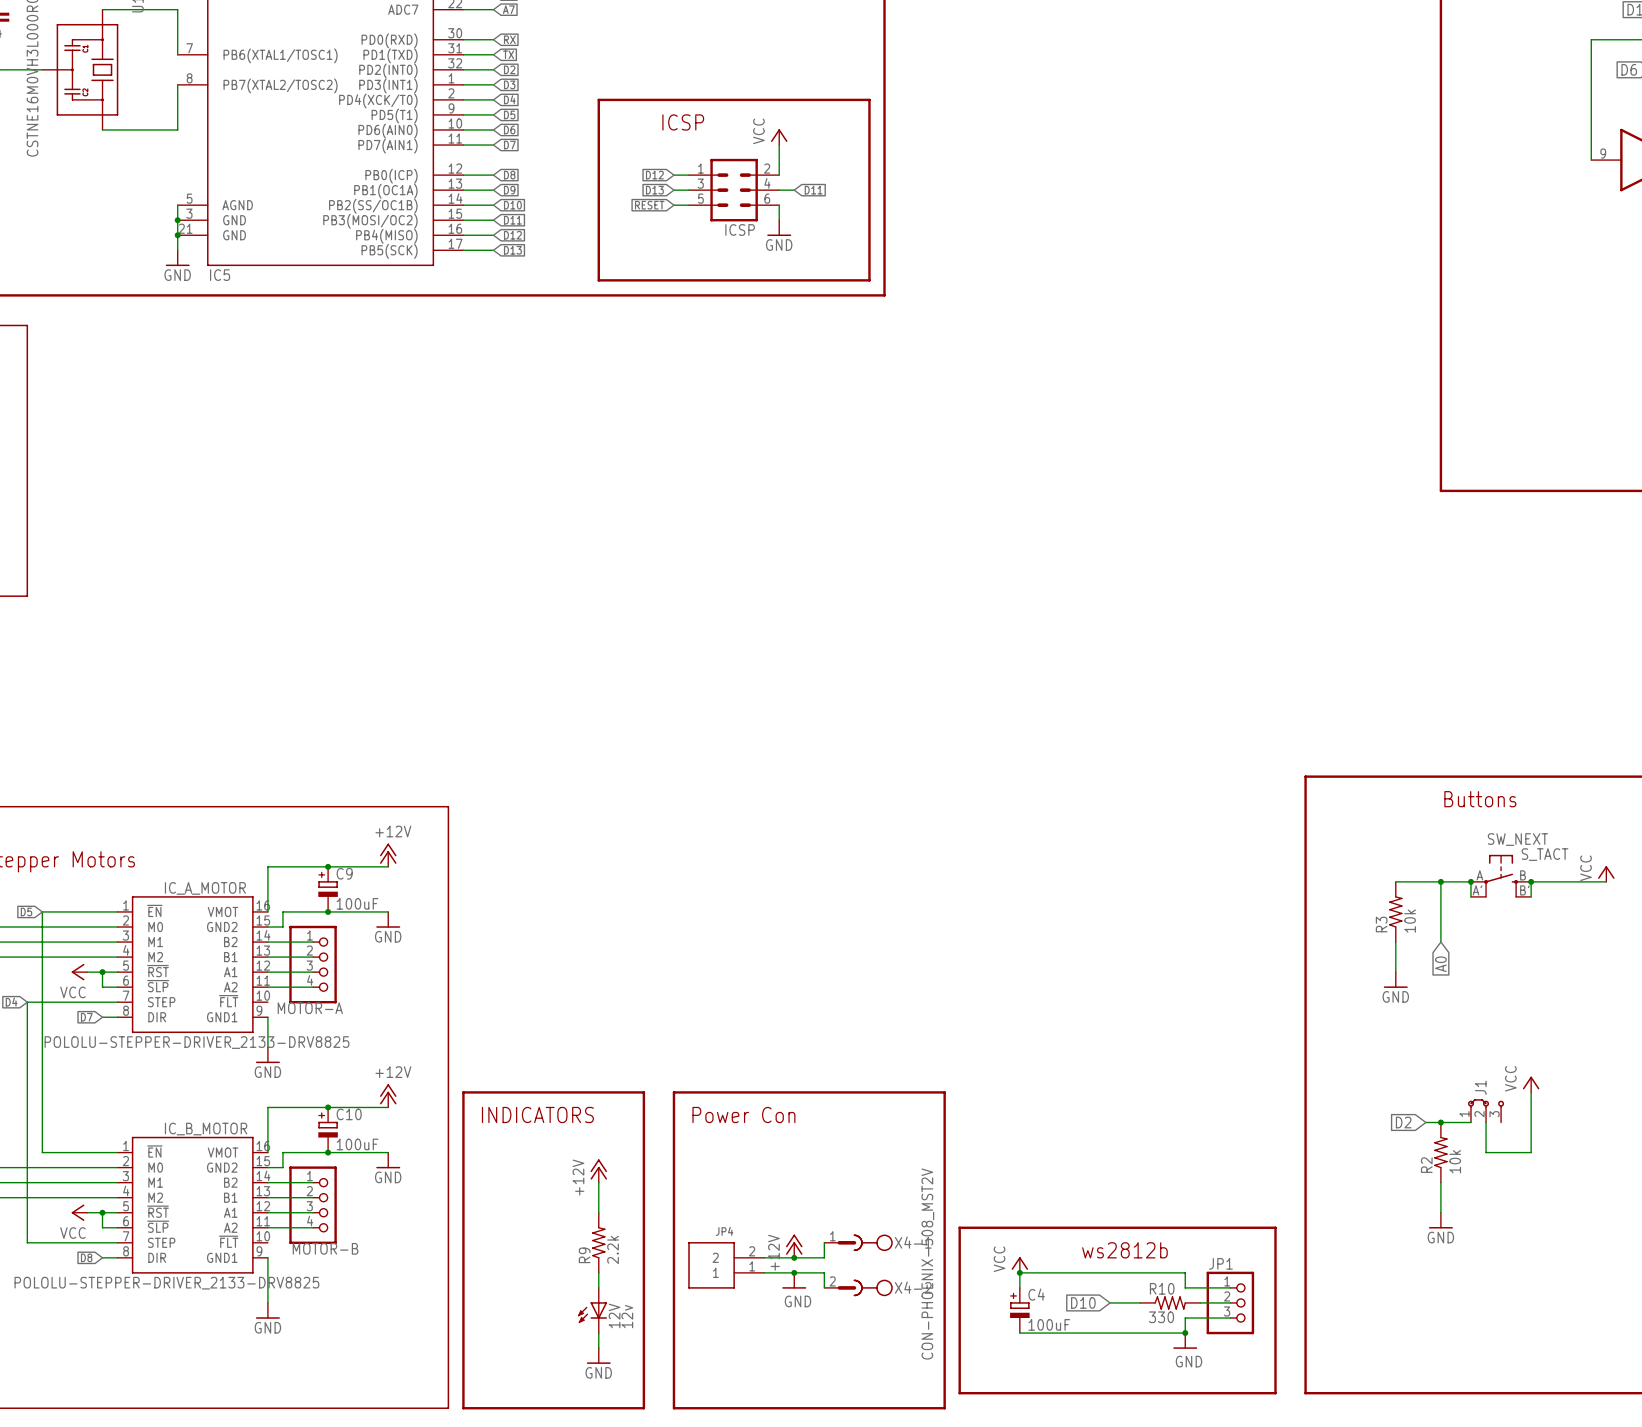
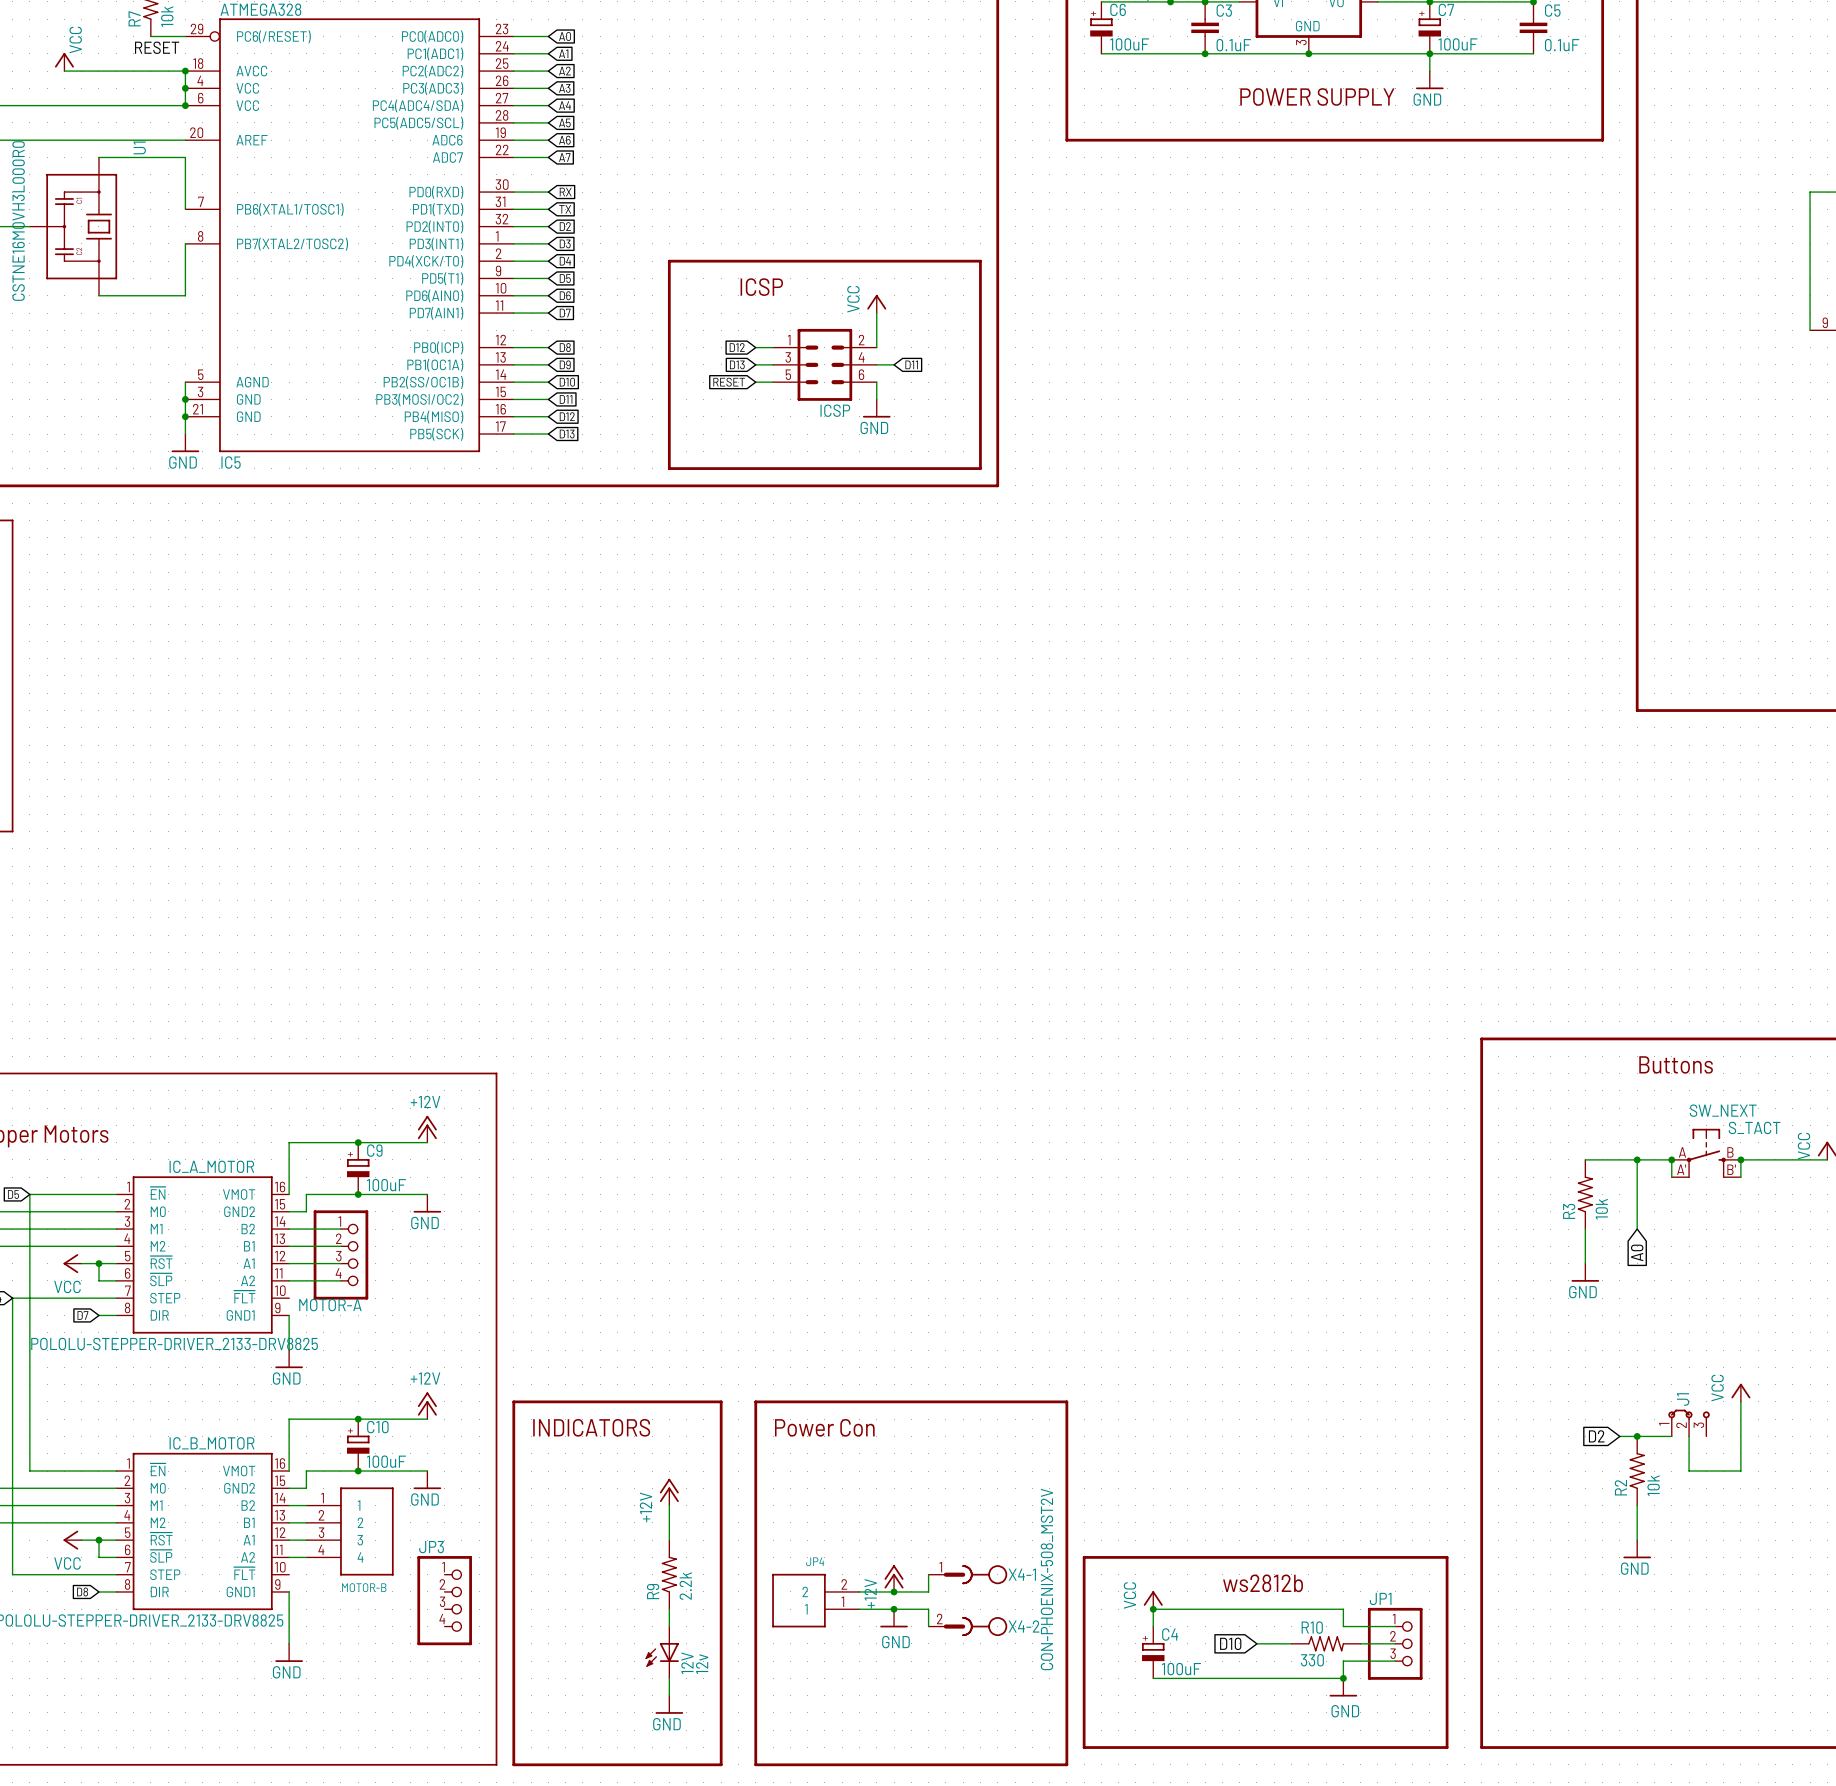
MOTOR-B: (313, 1205) -> none
MOTOR-B: none -> (350, 1531)
JP3: none -> (444, 1600)

